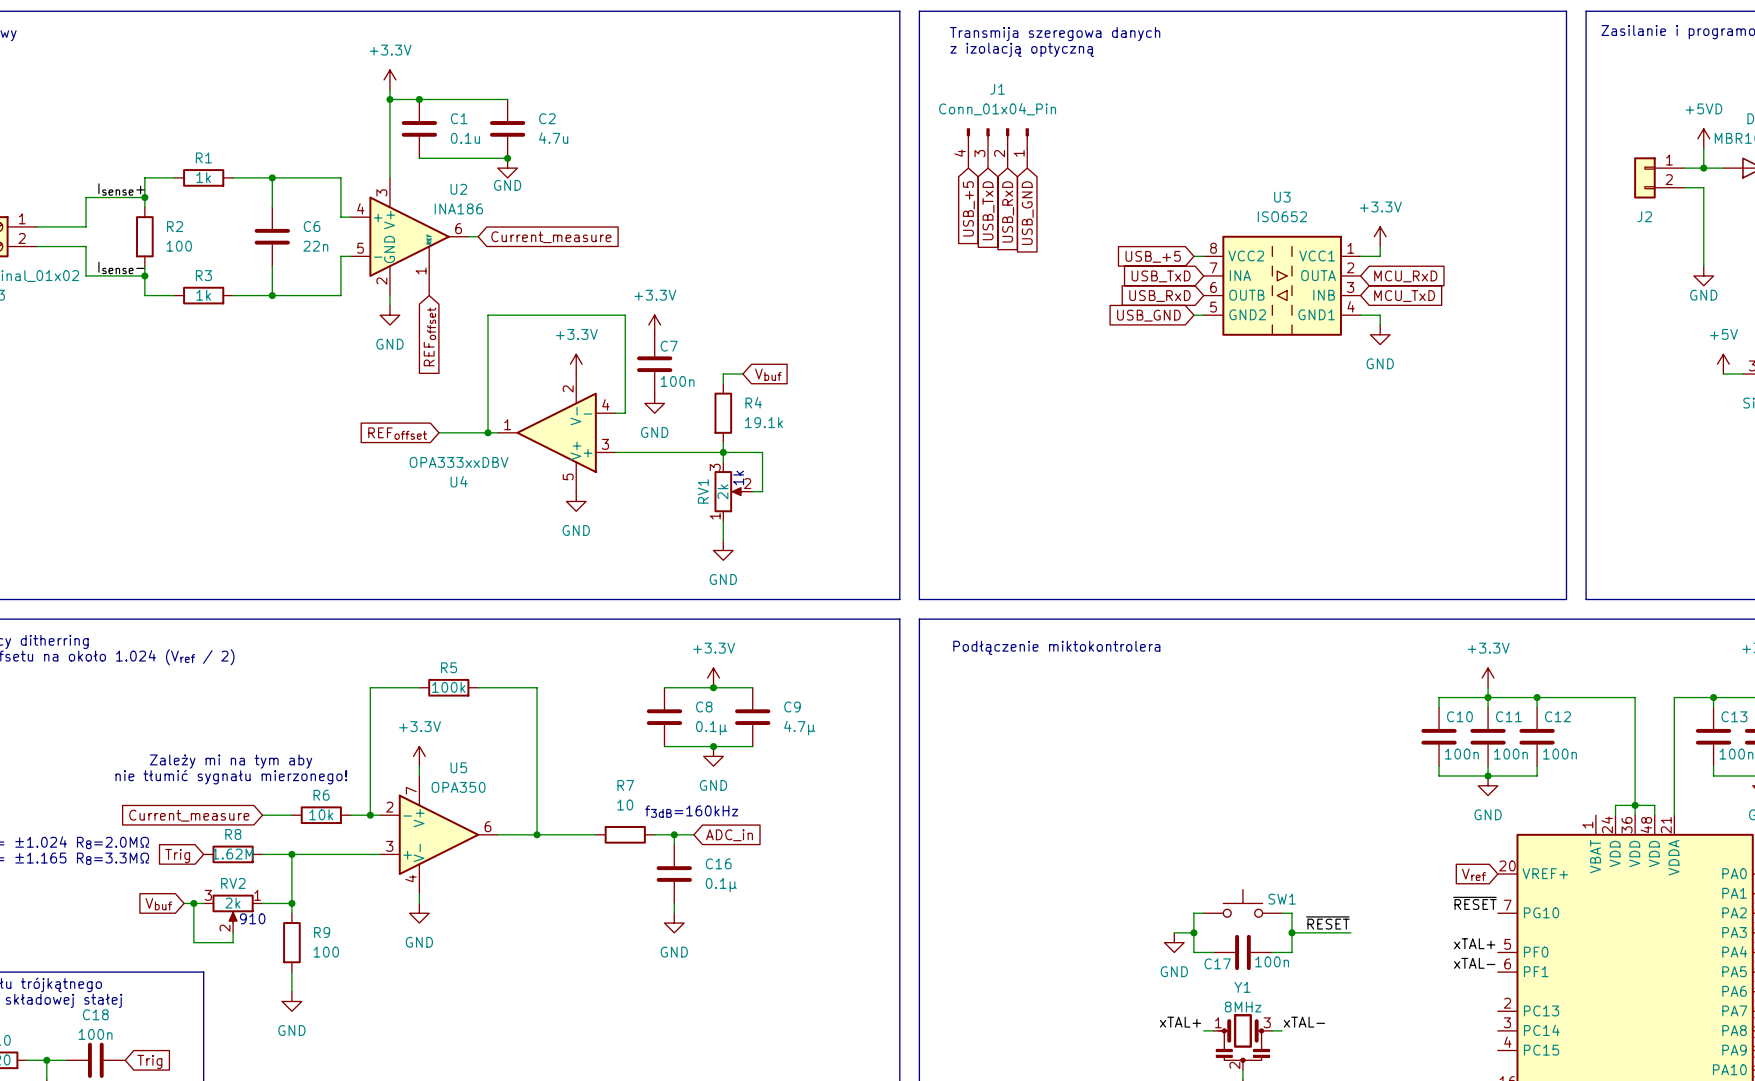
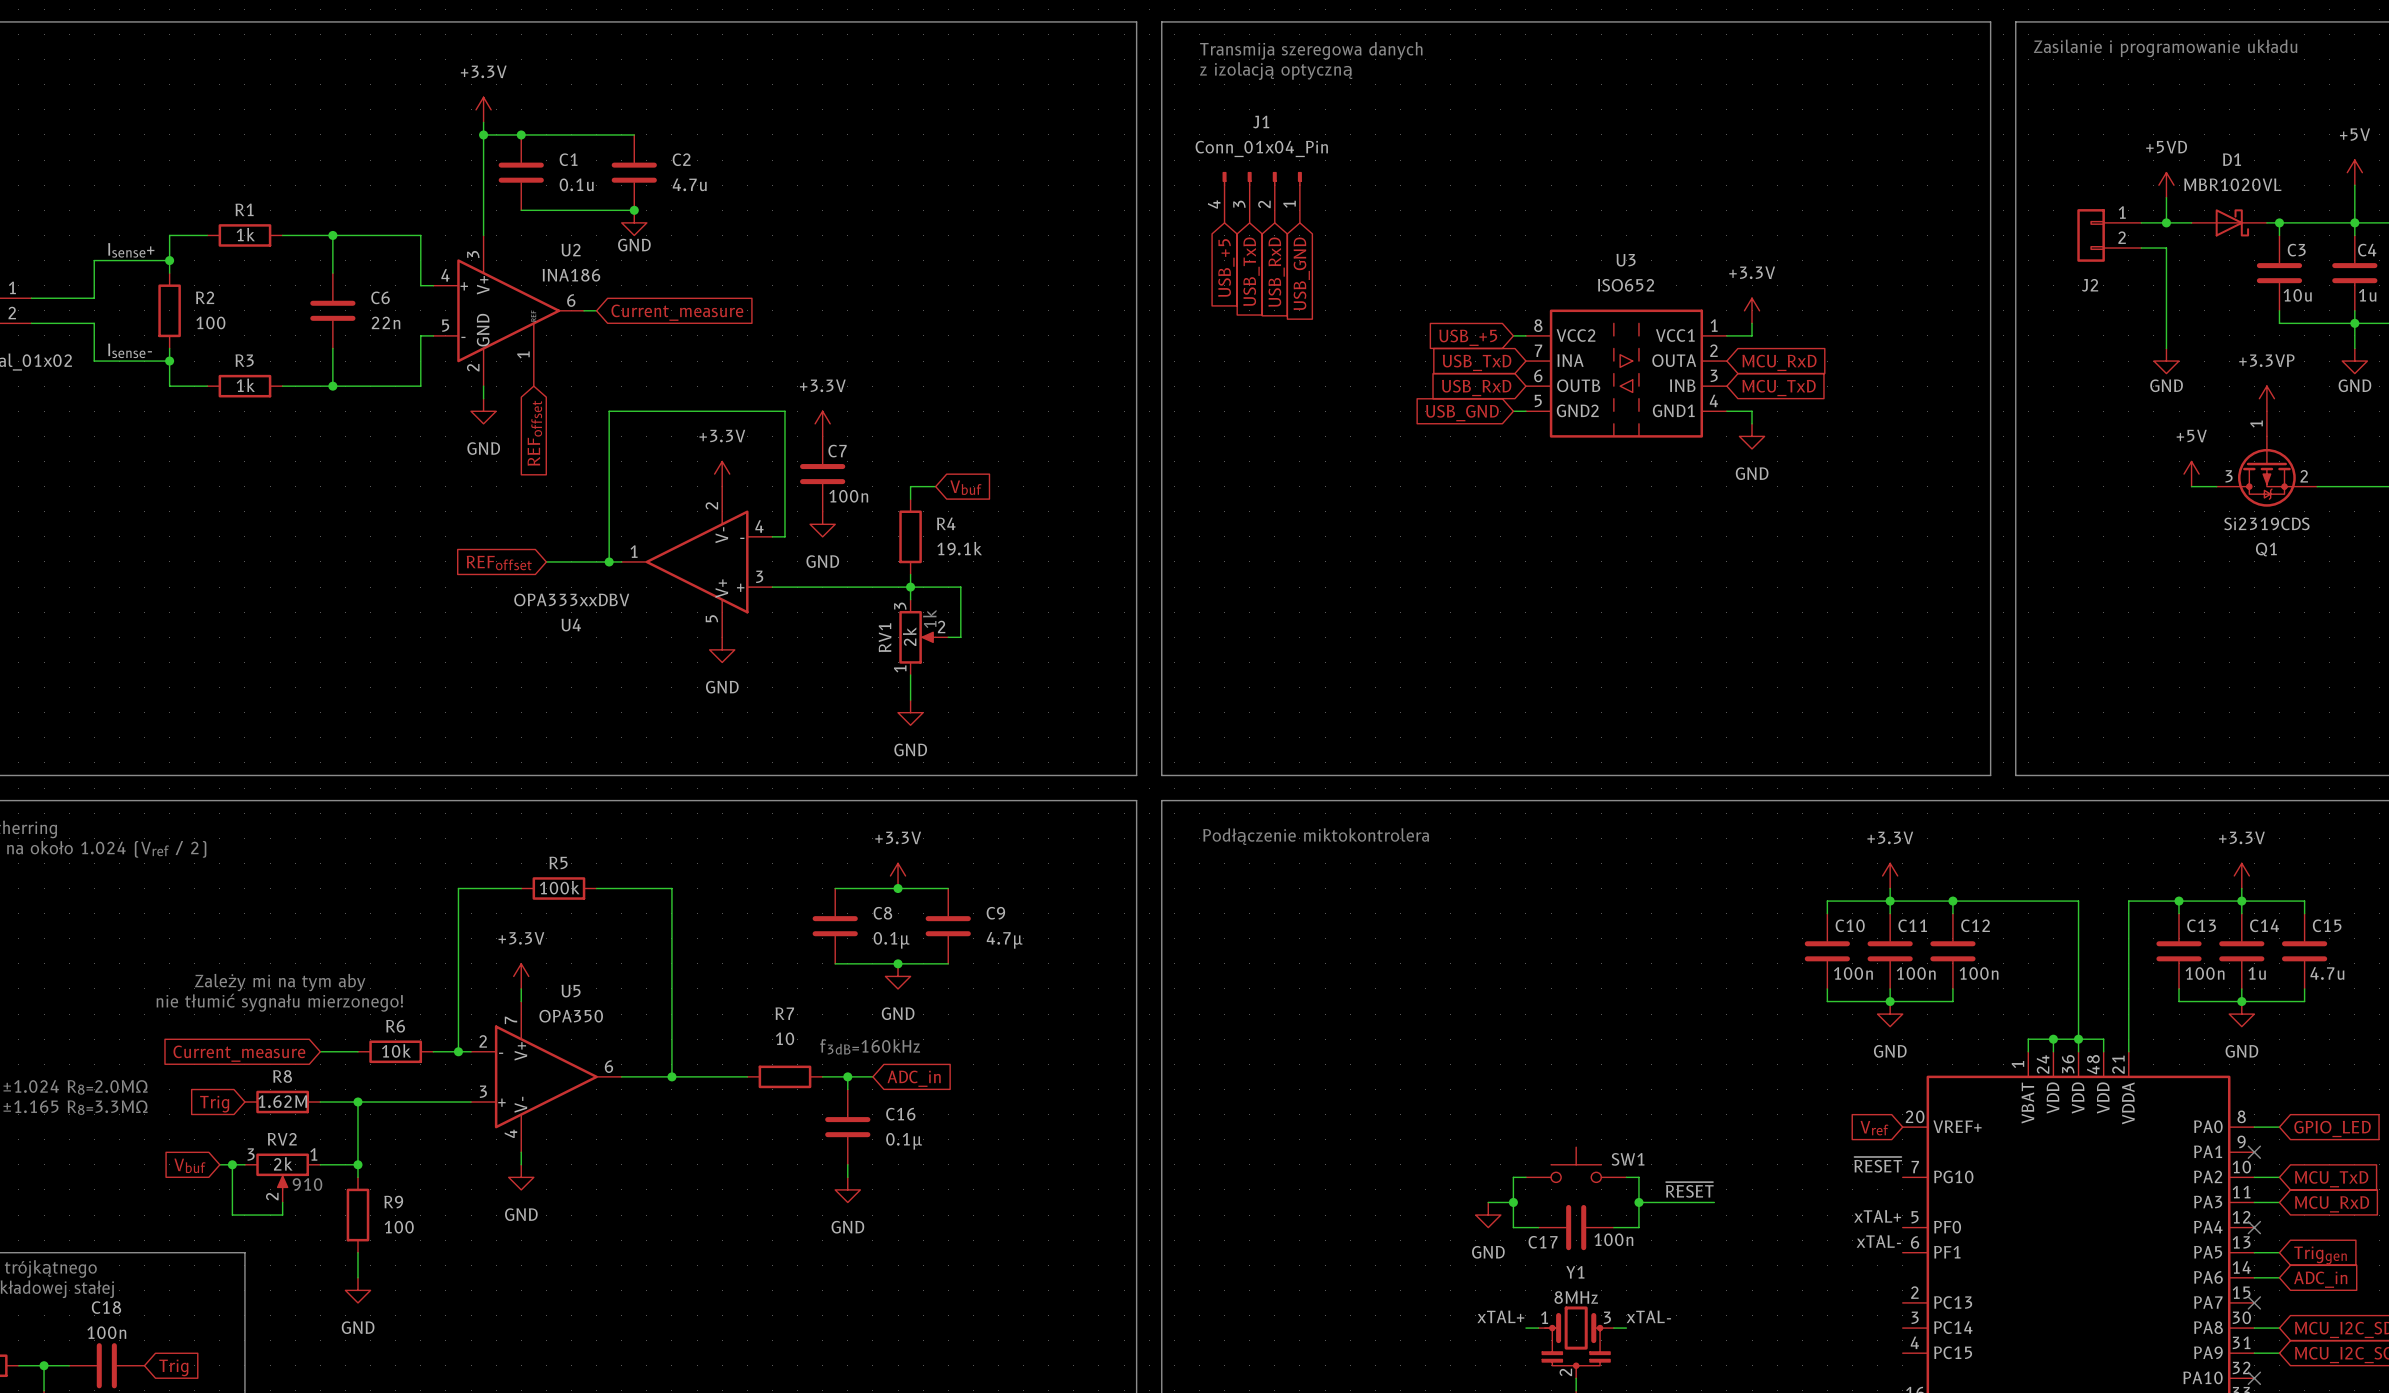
wire: none -> (2053, 1039) (2028, 1039) (2028, 1051)
junction: none -> (2053, 1039)

